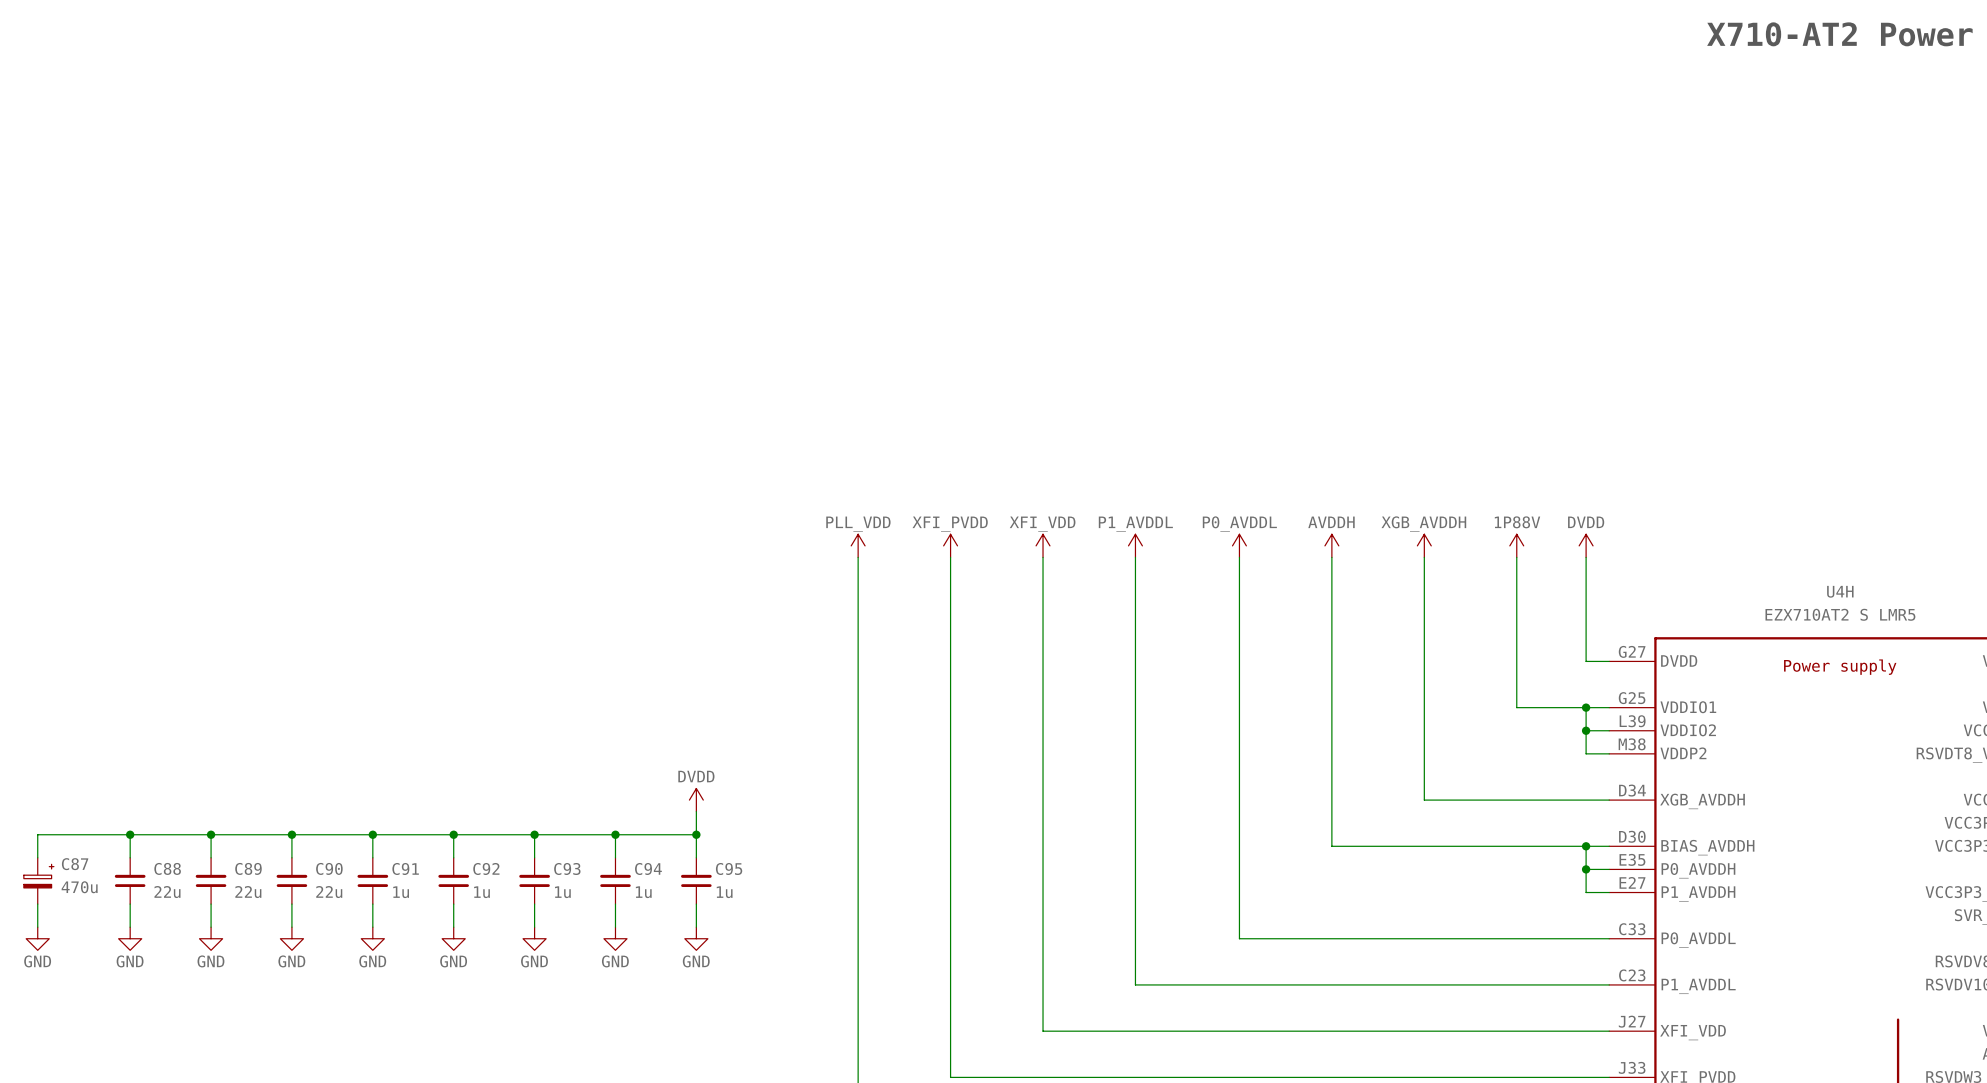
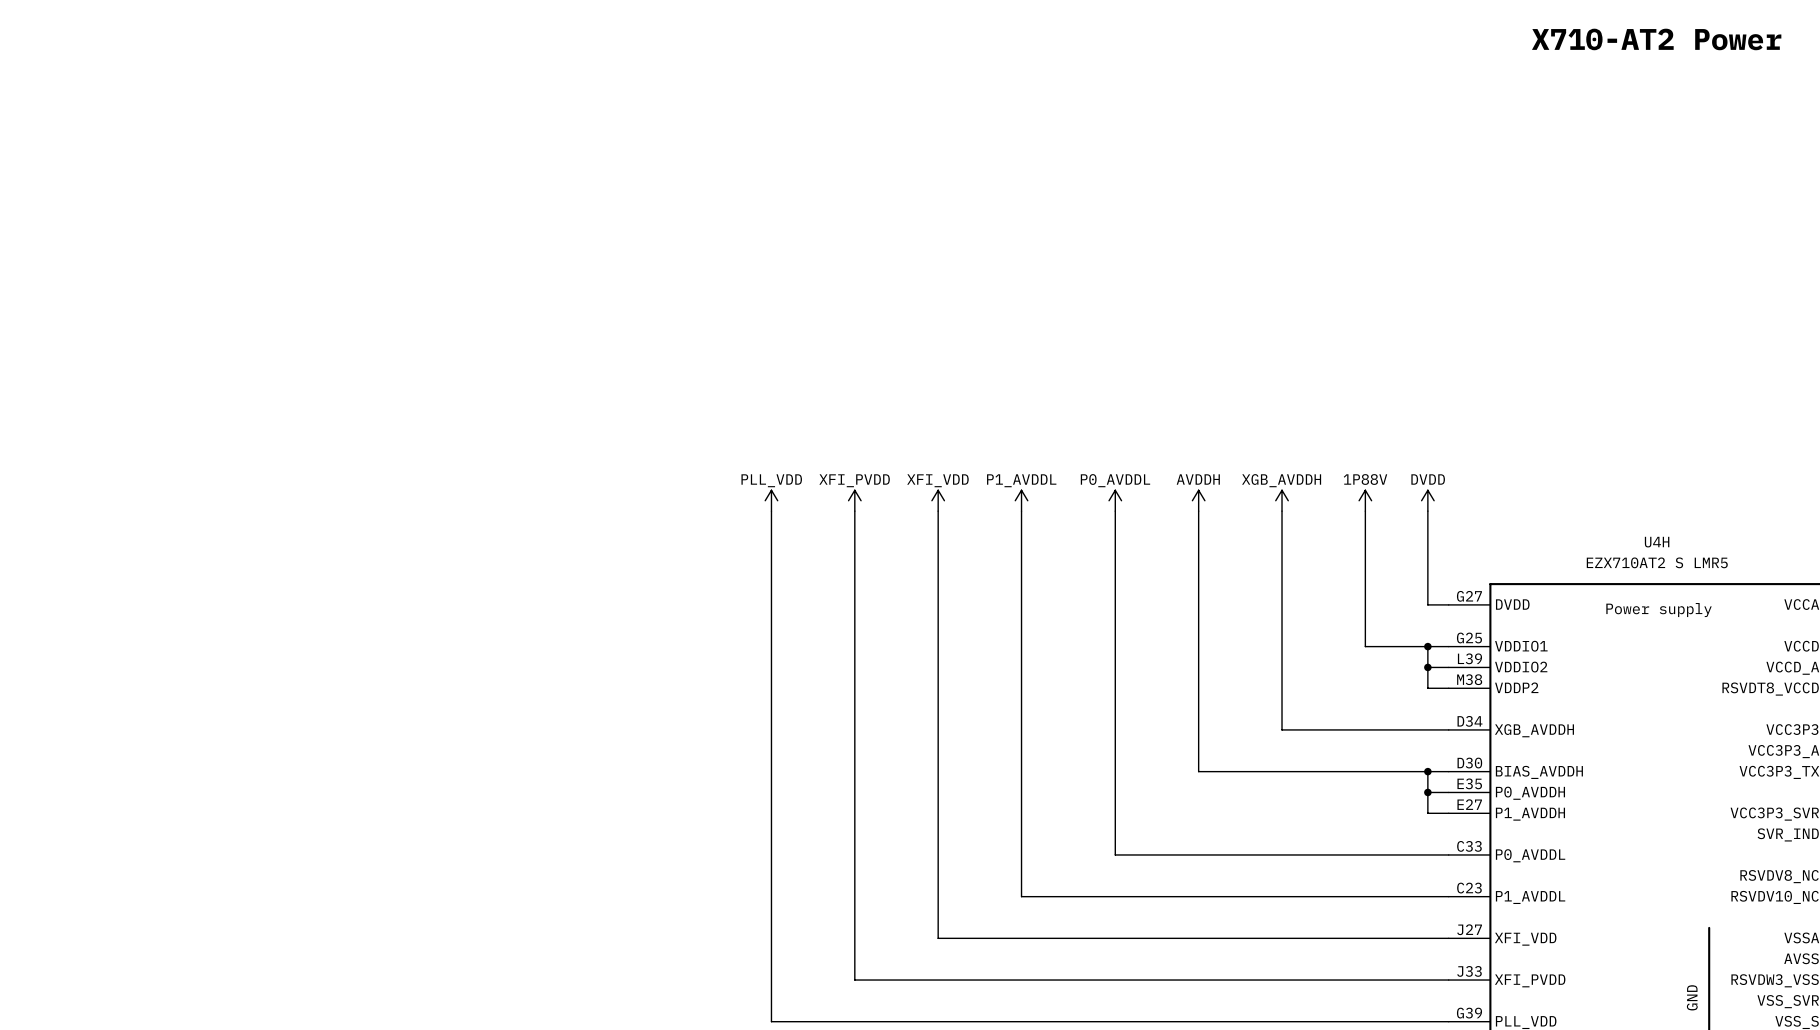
power symbol: DVDD (696, 800) -> none
wire: (696, 811) (696, 857) -> none
wire: (130, 834) (130, 857) -> none
junction: (130, 834) -> none
wire: (211, 834) (211, 857) -> none
junction: (211, 834) -> none
wire: (291, 834) (291, 857) -> none
junction: (291, 834) -> none
wire: (372, 834) (372, 857) -> none
junction: (372, 834) -> none
wire: (453, 834) (453, 857) -> none
junction: (453, 834) -> none
wire: (534, 834) (534, 857) -> none
junction: (534, 834) -> none
wire: (615, 834) (615, 857) -> none
junction: (615, 834) -> none
wire: (696, 834) (37, 834) (37, 857) -> none
junction: (696, 834) -> none
C87: (38, 880) -> none
C88: (130, 880) -> none
C89: (211, 880) -> none
C90: (291, 880) -> none
C91: (372, 880) -> none
C92: (453, 880) -> none
C93: (534, 880) -> none
C94: (615, 880) -> none
C95: (696, 880) -> none
wire: (37, 904) (37, 927) -> none
wire: (130, 904) (130, 927) -> none
wire: (211, 904) (211, 927) -> none
wire: (291, 904) (291, 927) -> none
wire: (372, 904) (372, 927) -> none
wire: (453, 904) (453, 927) -> none
wire: (534, 904) (534, 927) -> none
wire: (615, 904) (615, 927) -> none
wire: (696, 904) (696, 927) -> none
power symbol: GND (37, 938) -> none
power symbol: GND (130, 938) -> none
power symbol: GND (211, 938) -> none
power symbol: GND (291, 938) -> none
power symbol: GND (372, 938) -> none
power symbol: GND (453, 938) -> none
power symbol: GND (534, 938) -> none
power symbol: GND (615, 938) -> none
power symbol: GND (696, 938) -> none

